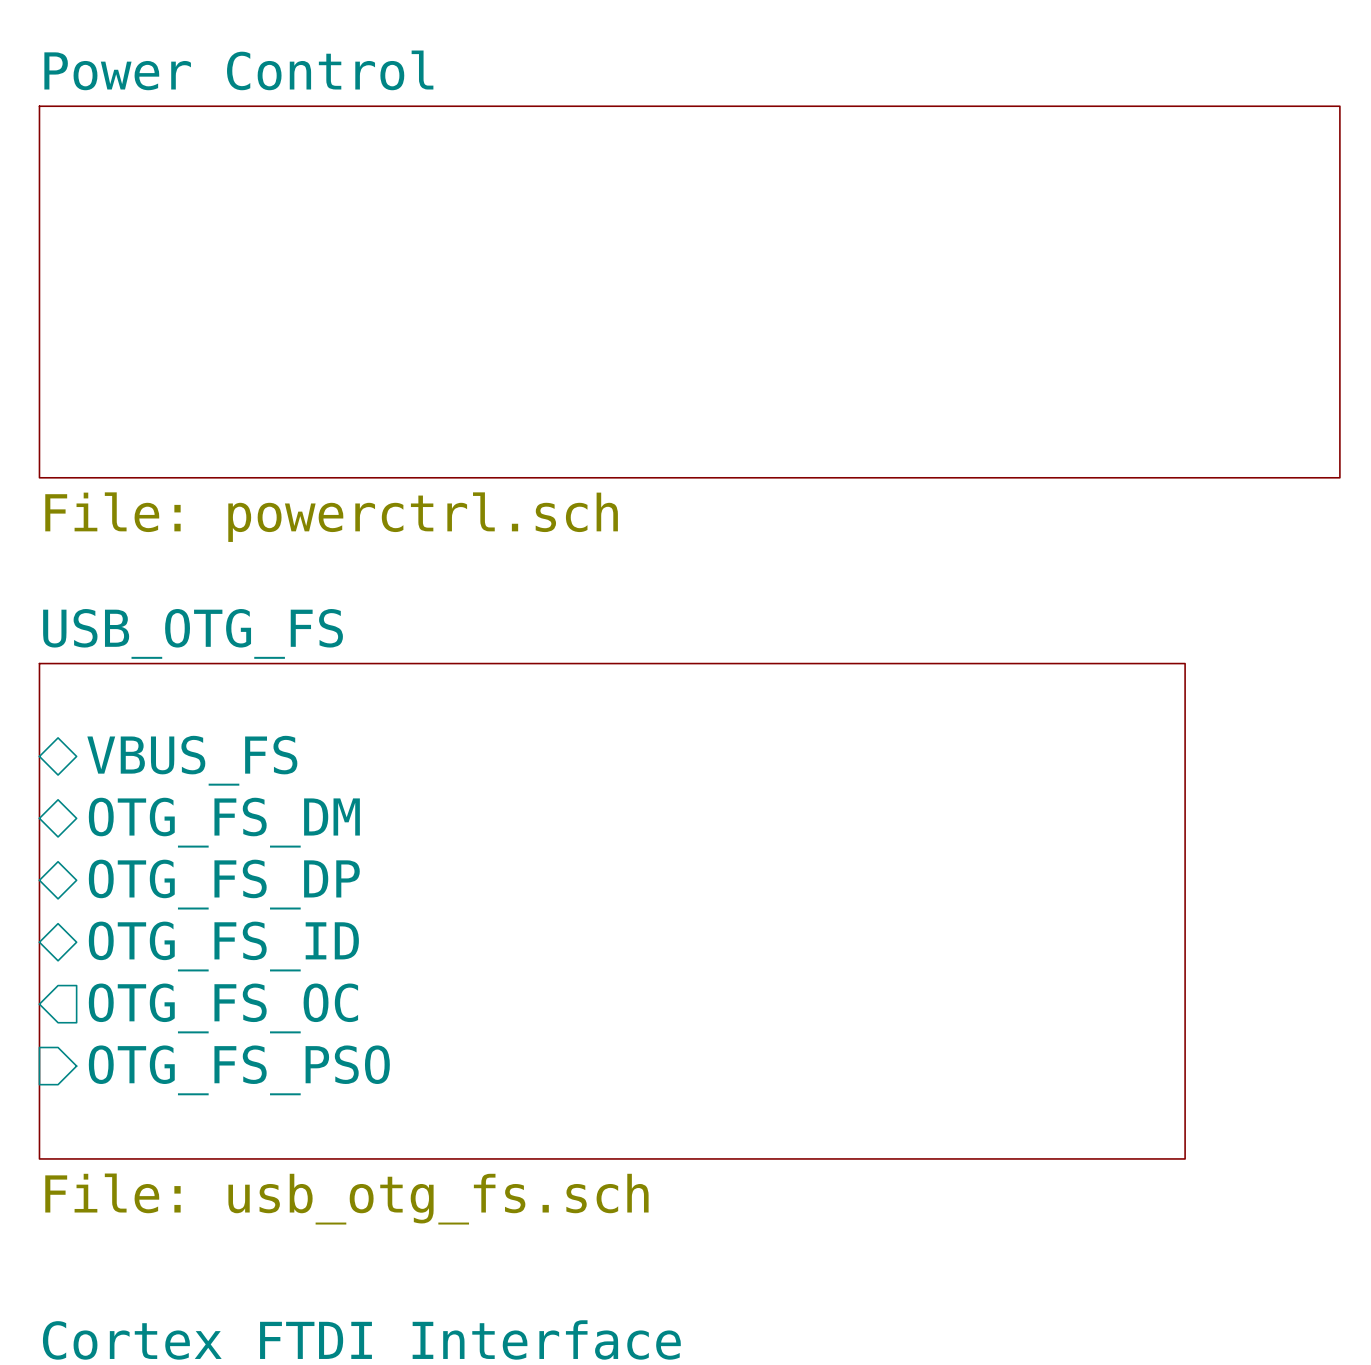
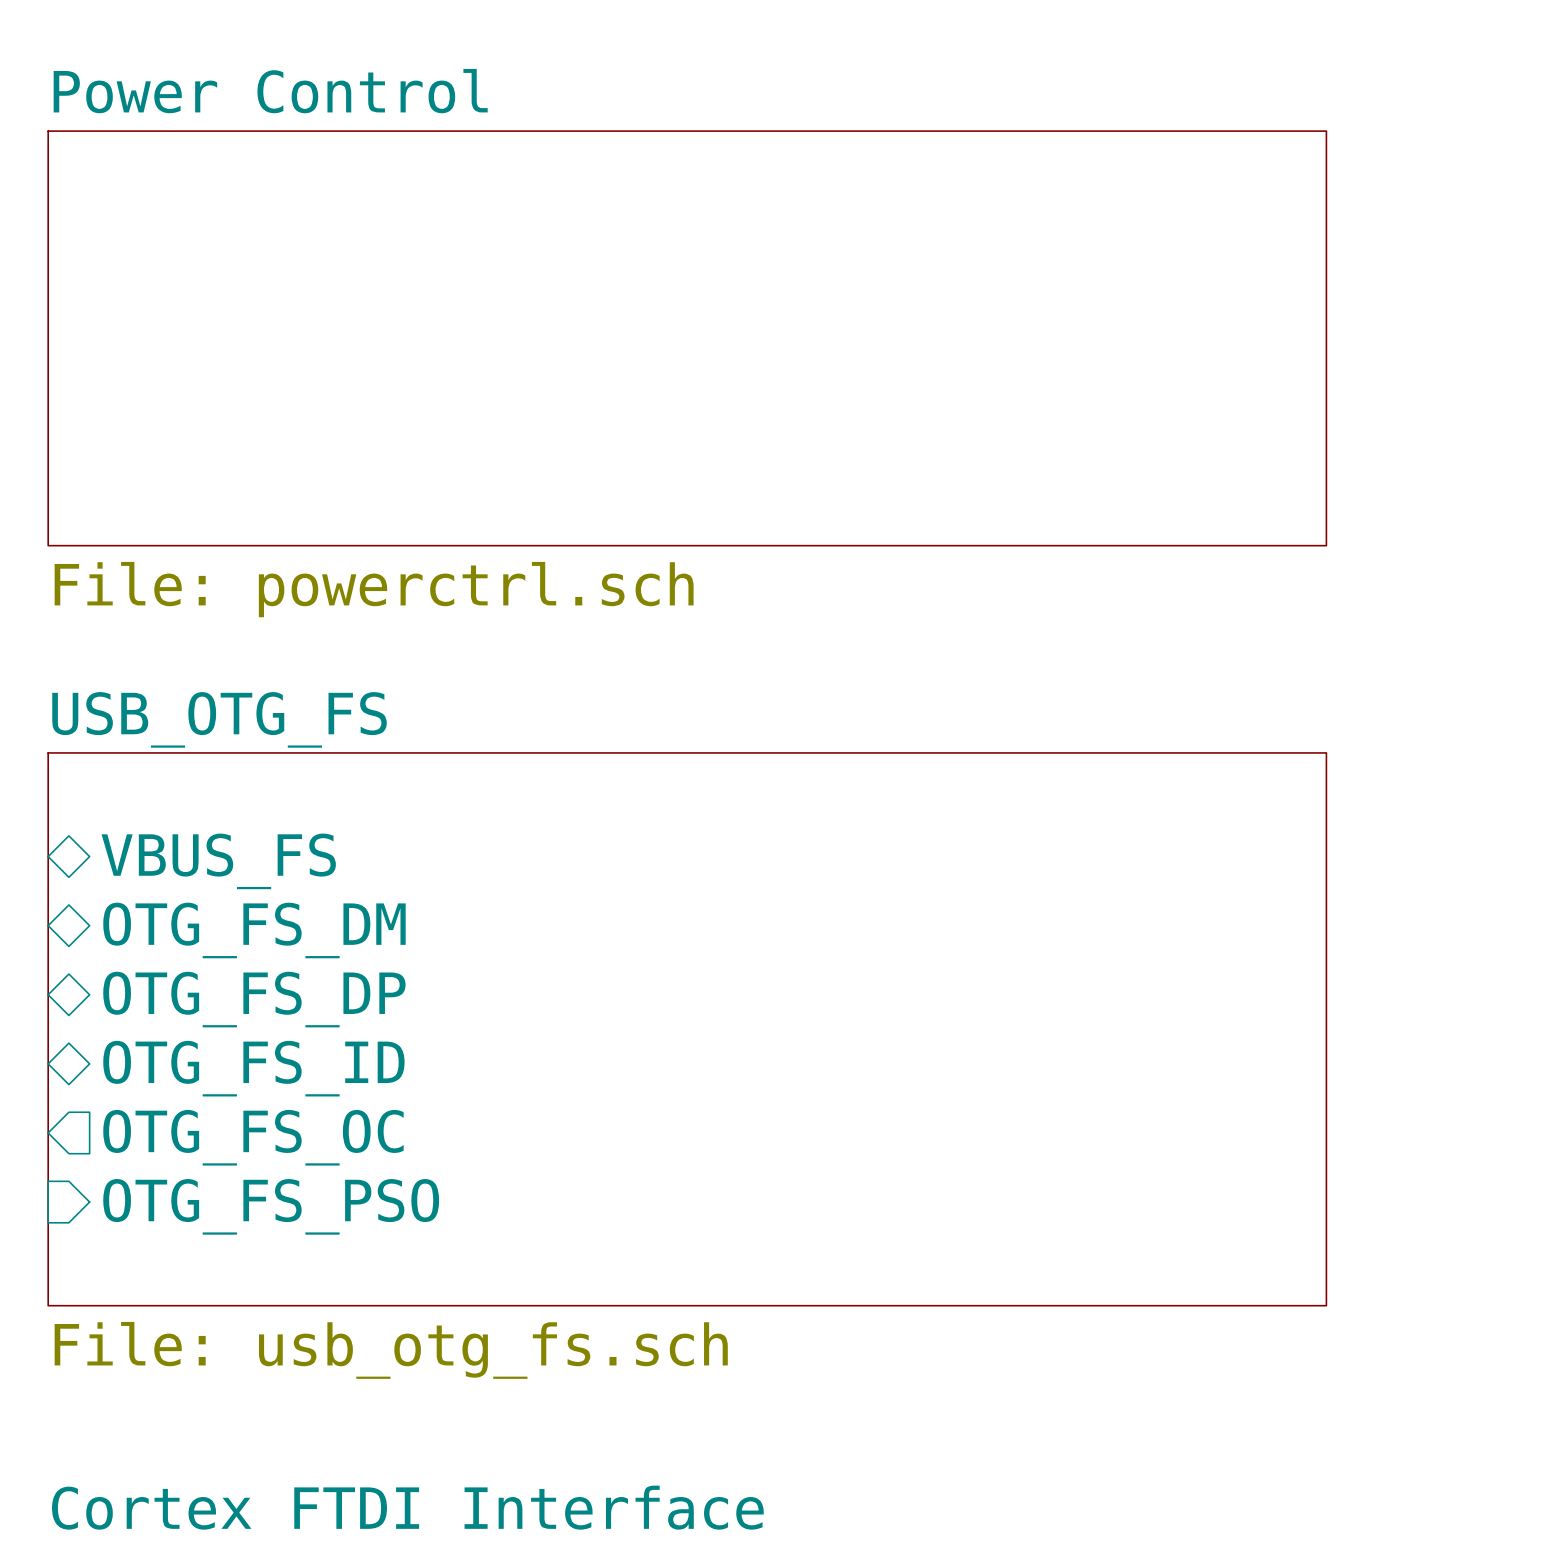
sheet Power Control: none -> File: powerctrl.sch (687, 338)
sheet Power Control: File: powerctrl.sch (689, 292) -> none

